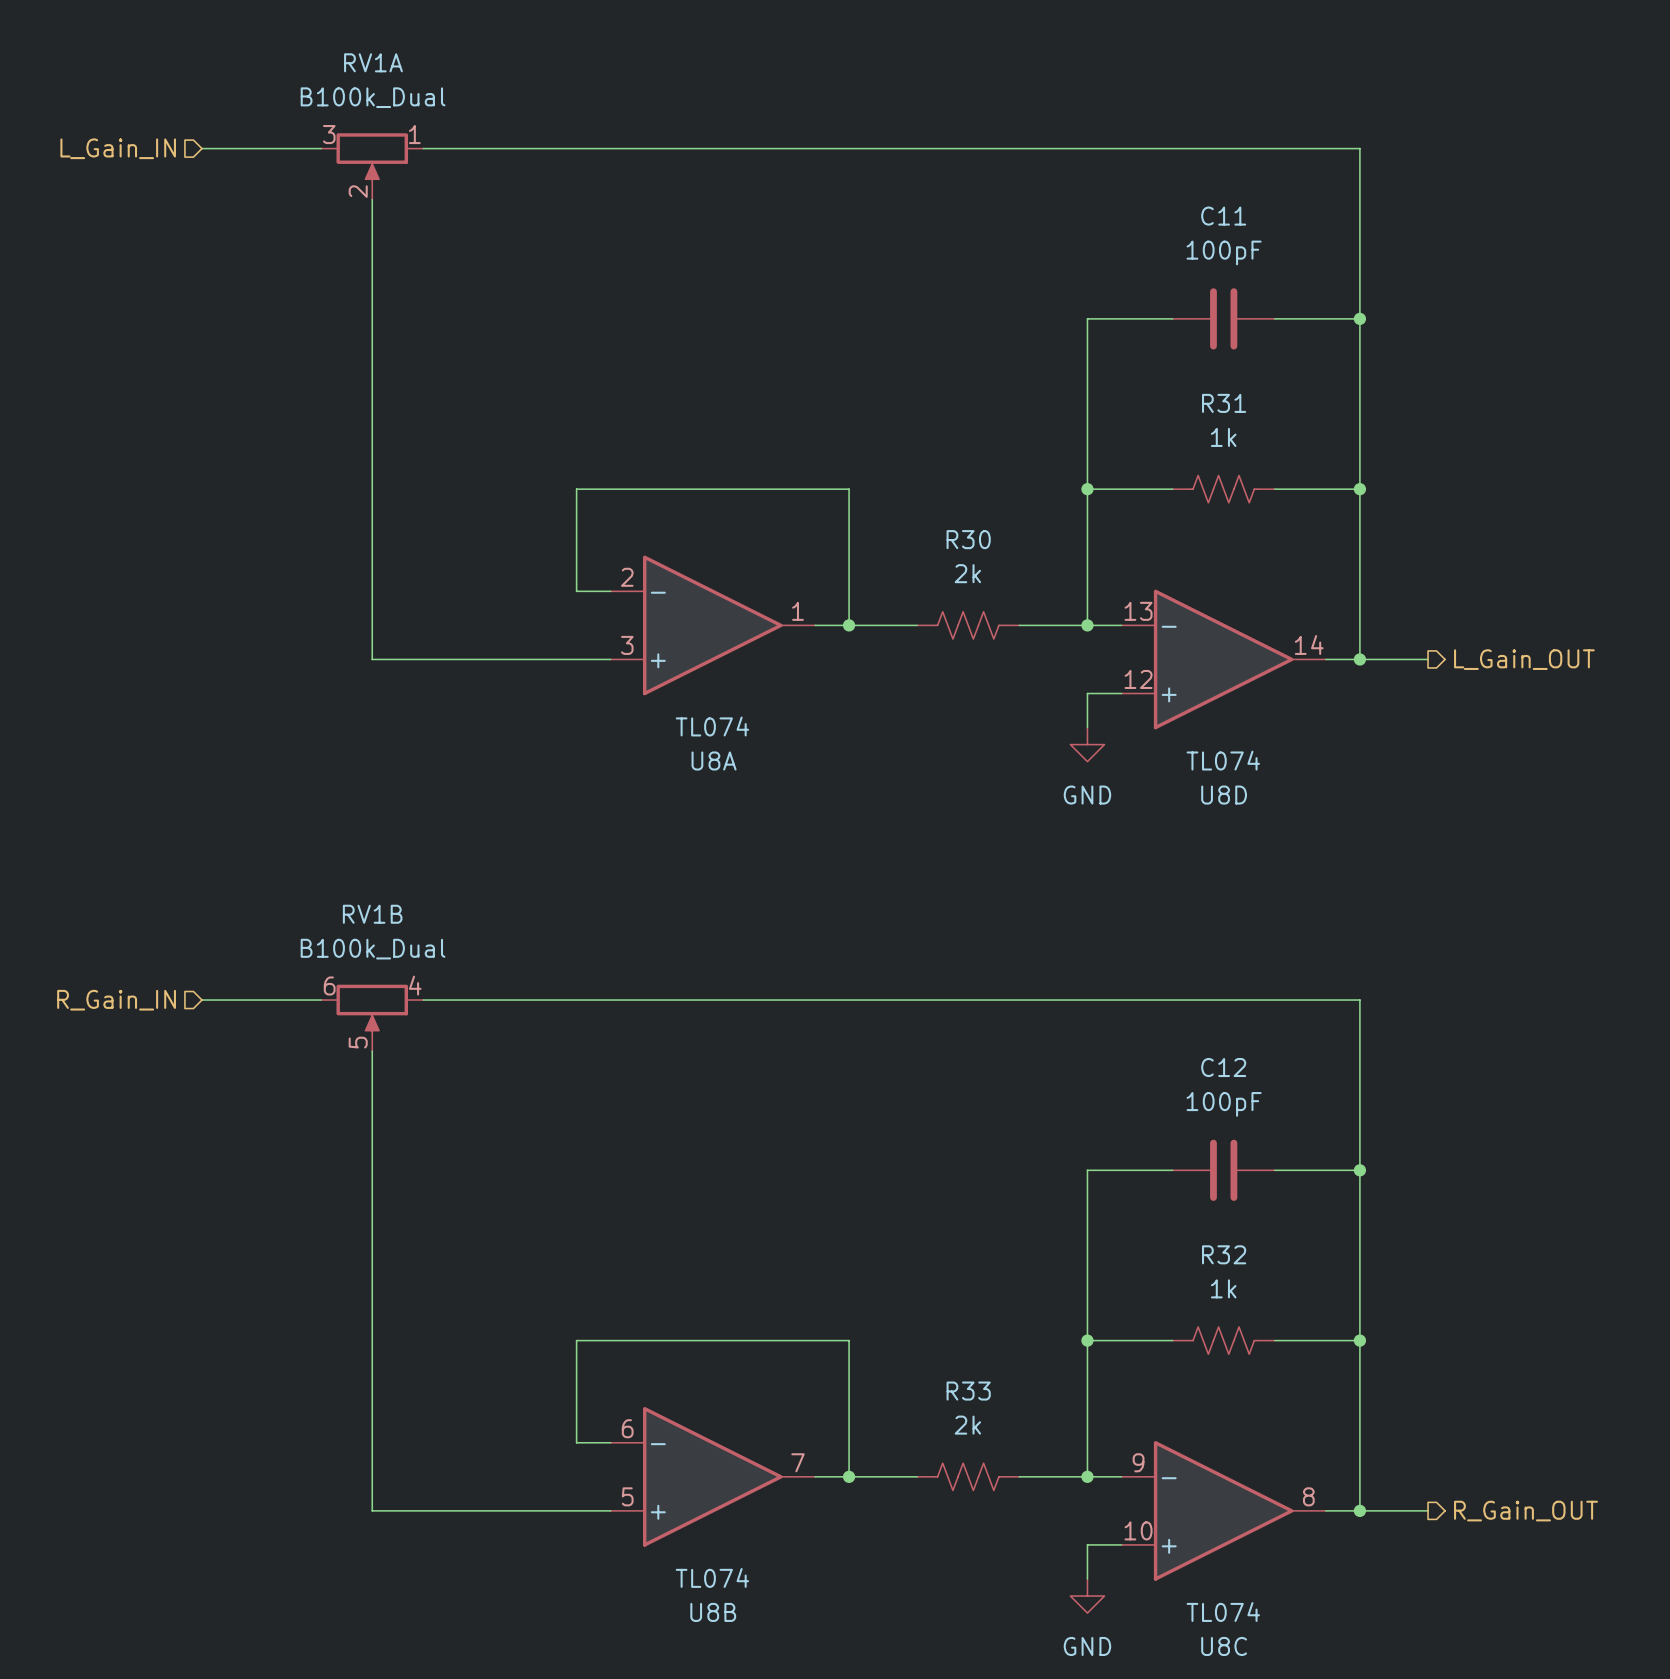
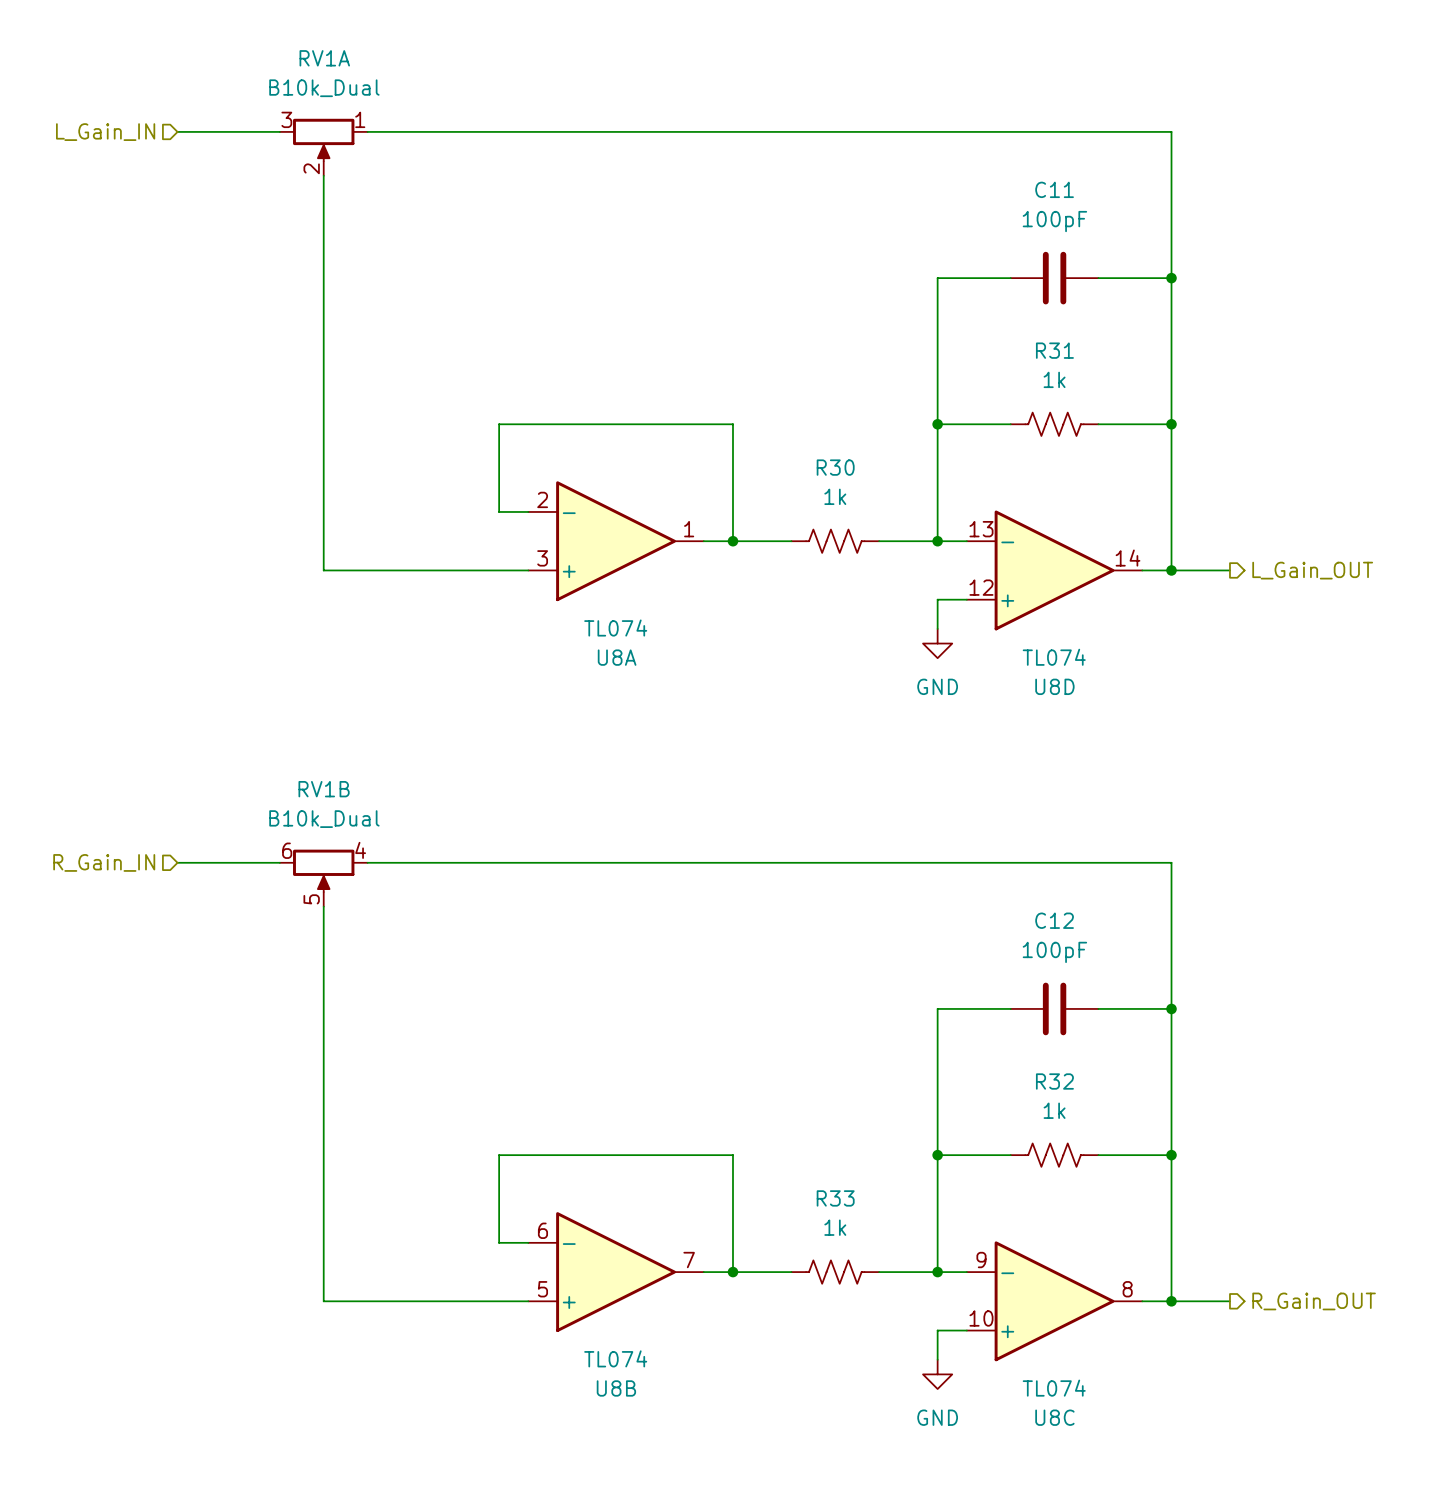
RV1A value: B100k_Dual (373, 97) -> B10k_Dual (324, 88)
R30 value: 2k (967, 573) -> 1k (835, 496)
RV1B value: B100k_Dual (373, 949) -> B10k_Dual (324, 819)
R33 value: 2k (967, 1425) -> 1k (835, 1227)

